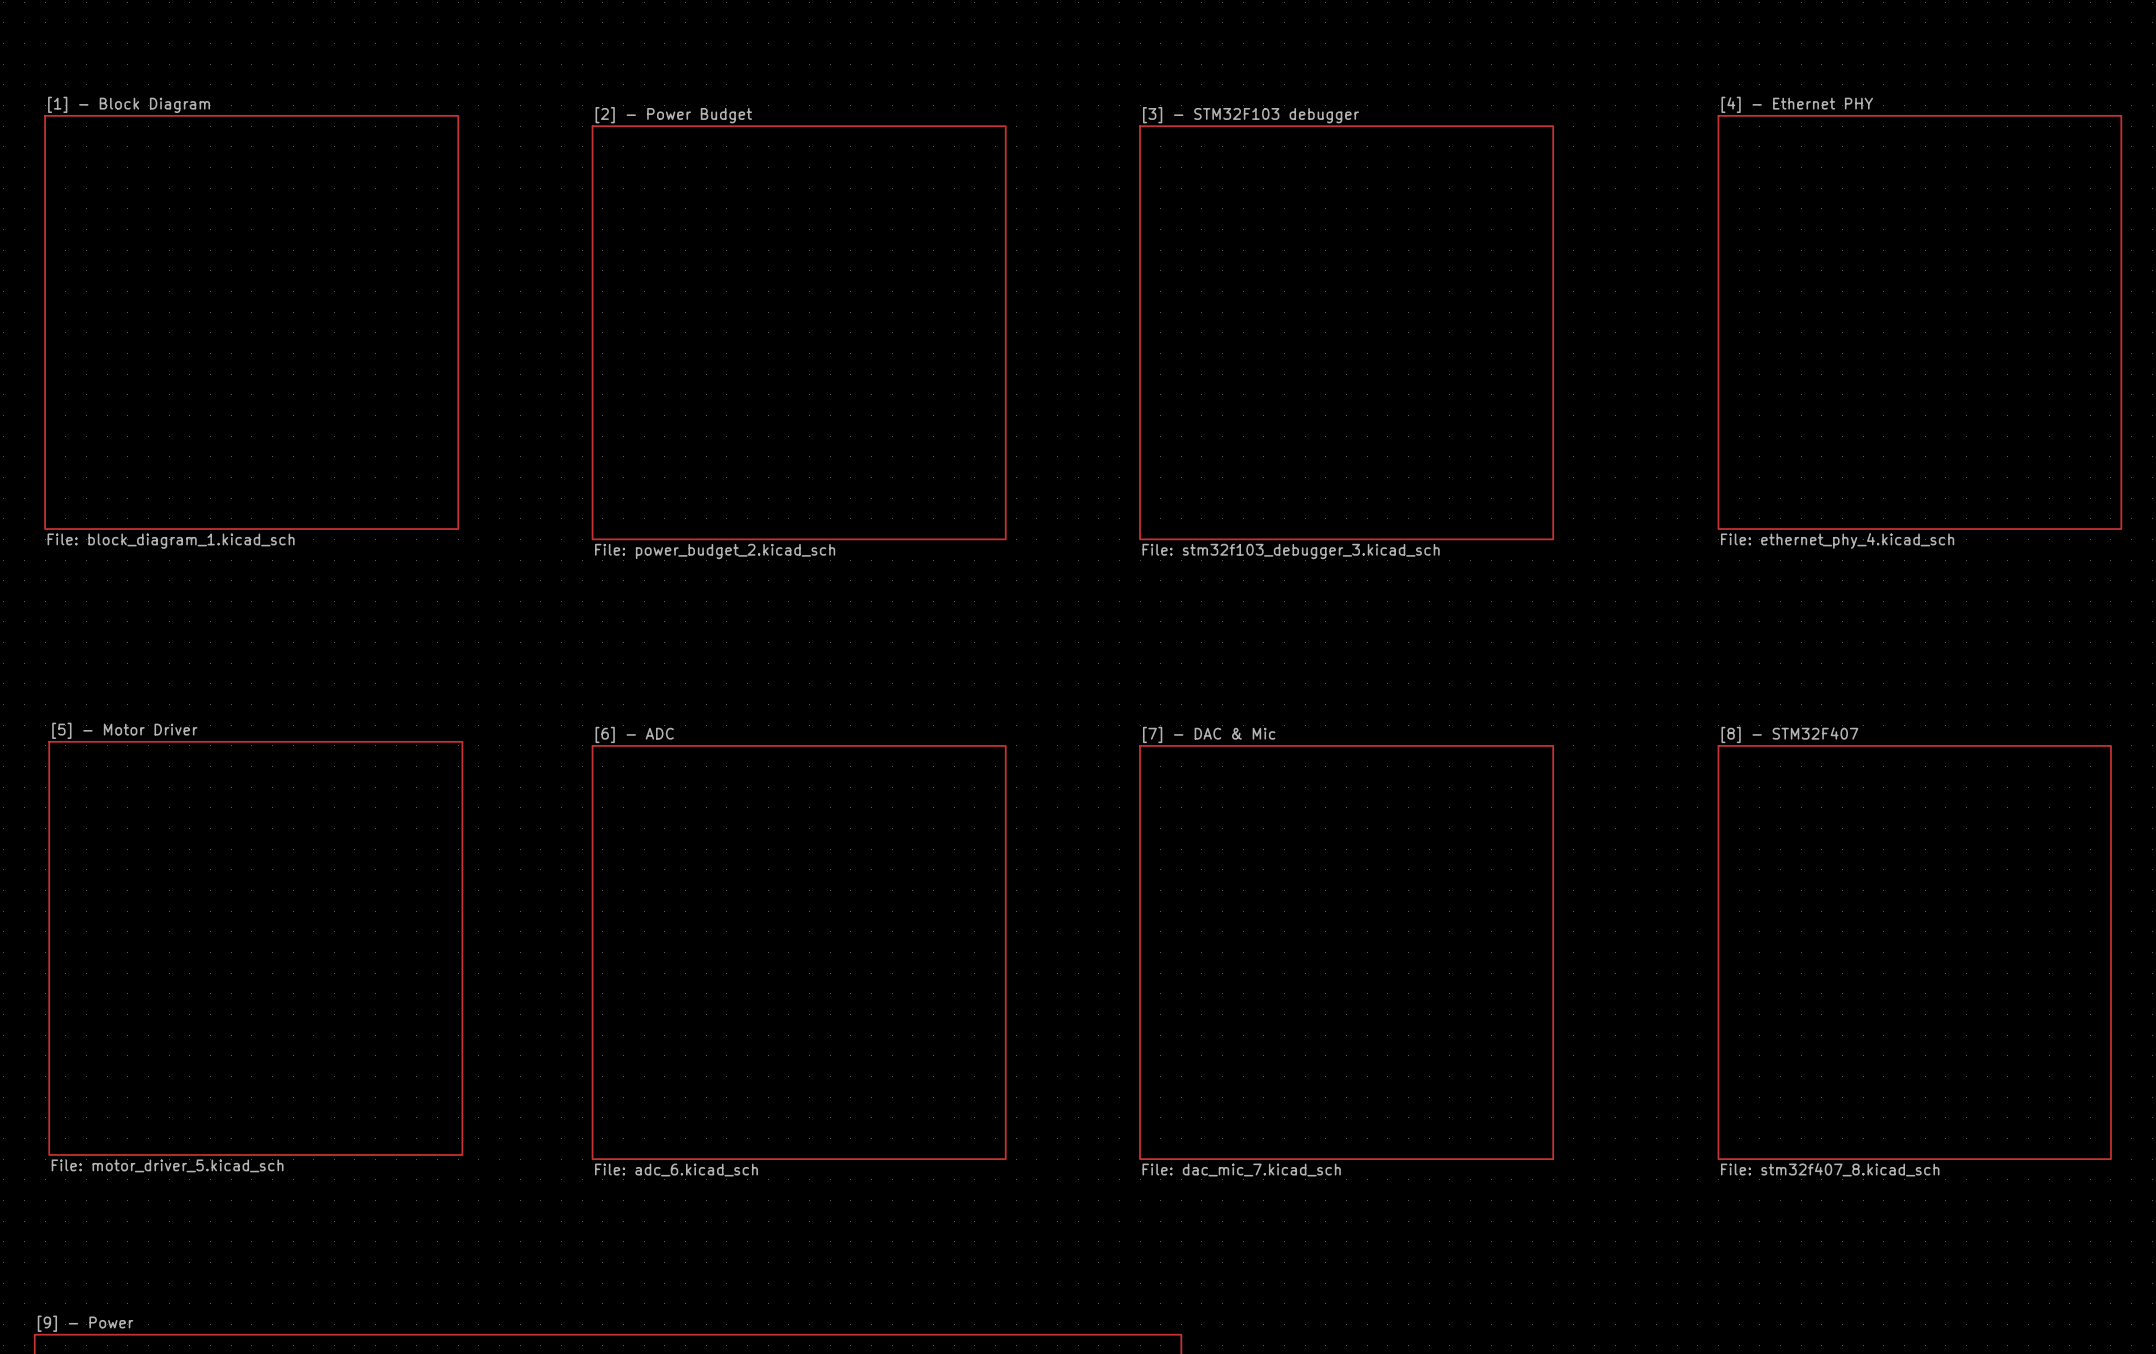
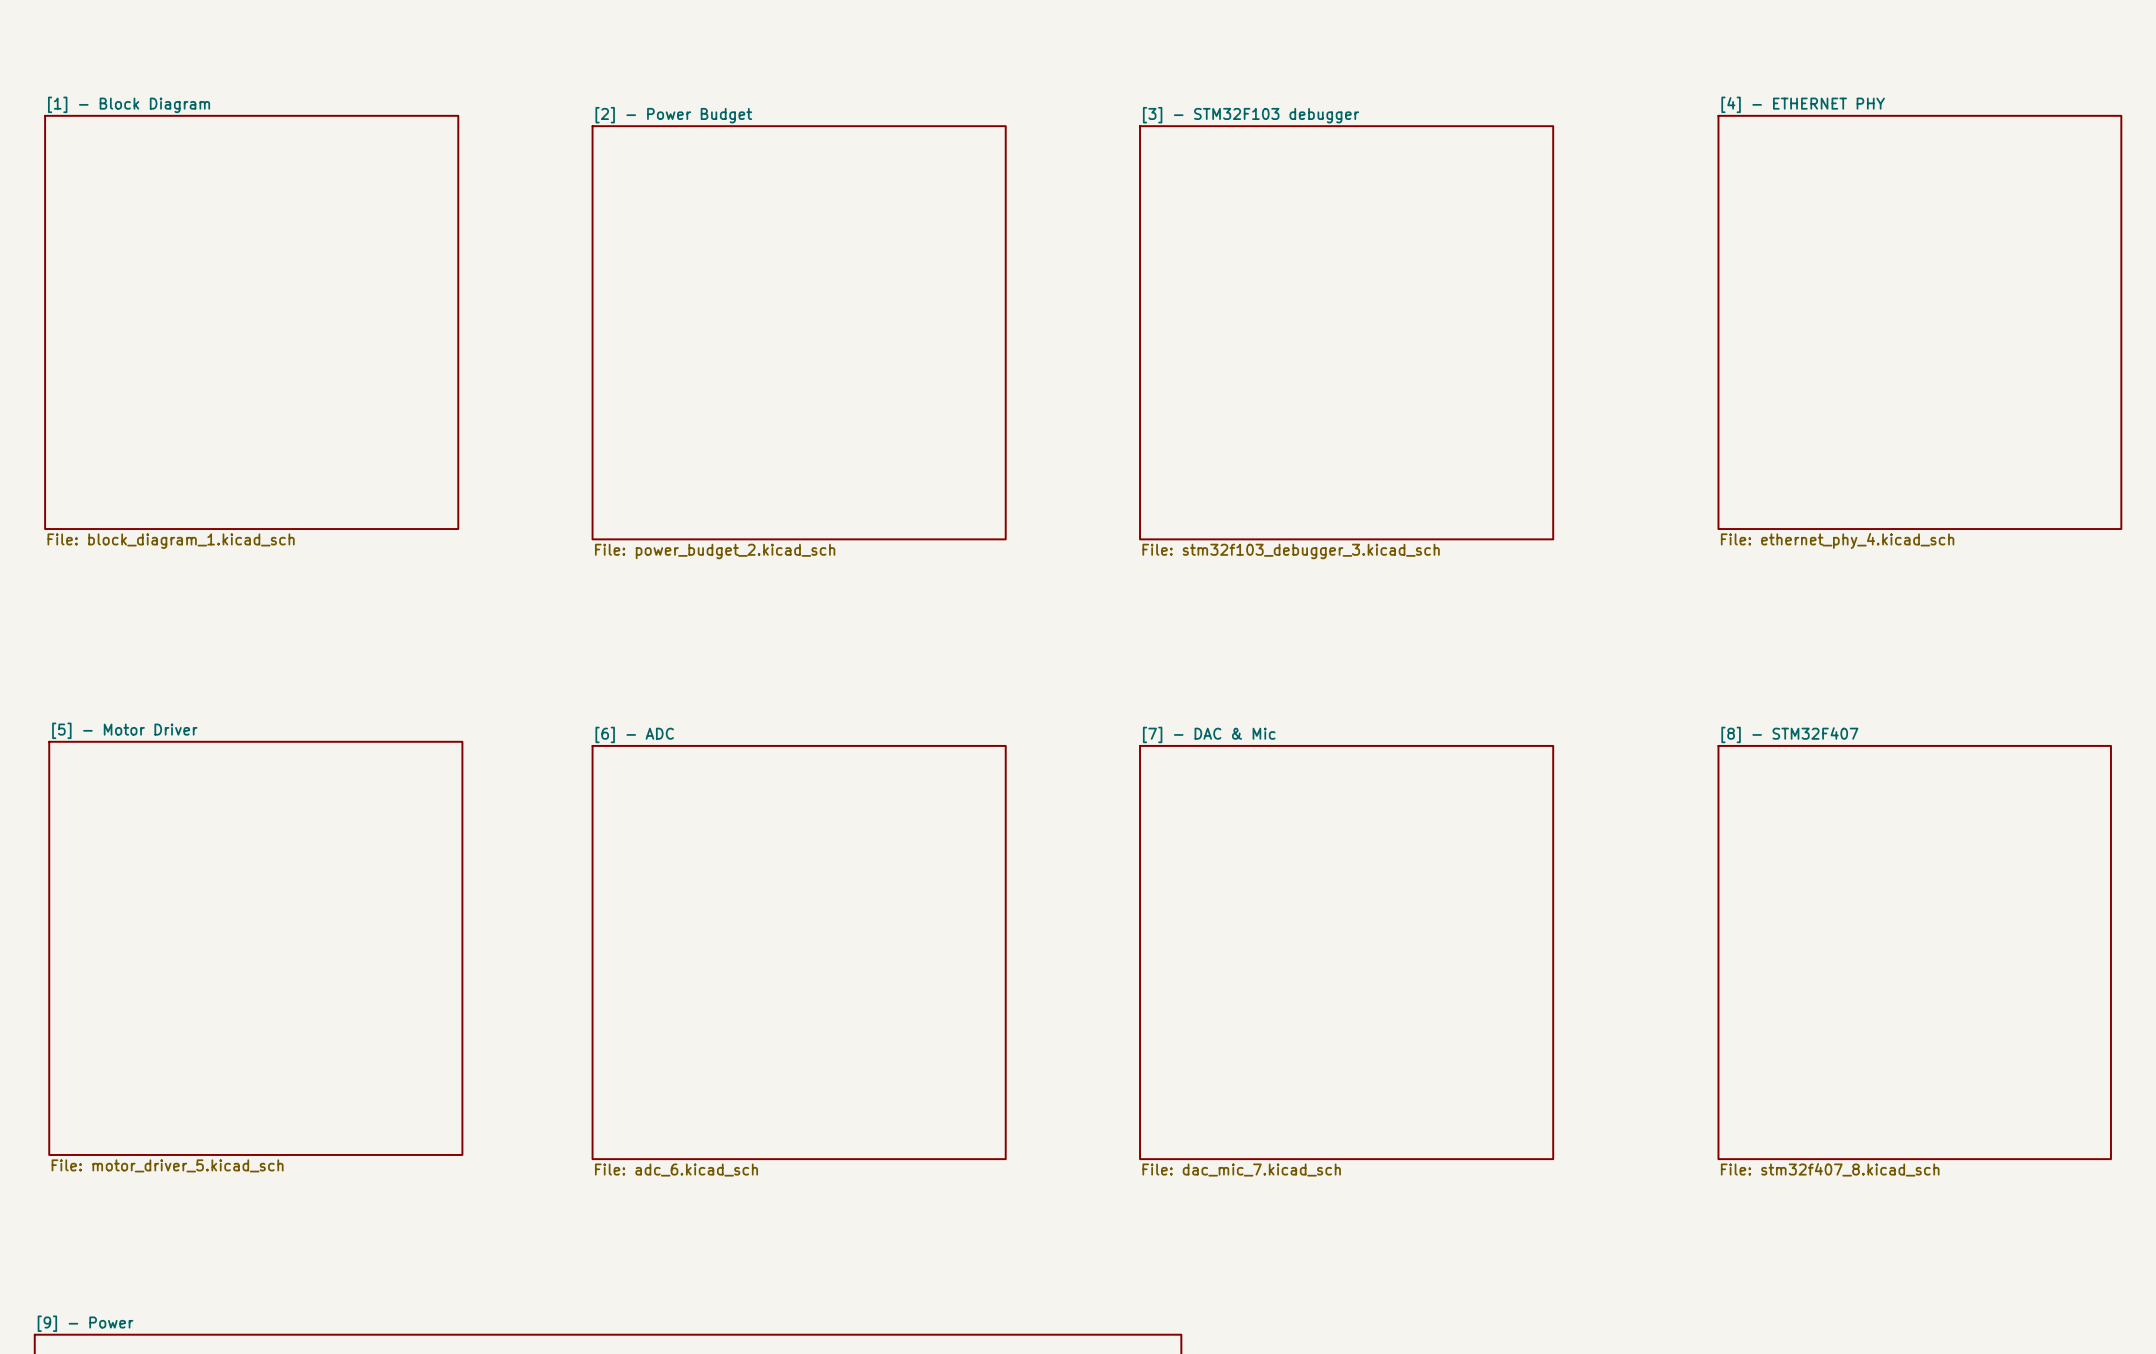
sheet [4] - Ethernet PHY name: [4] - Ethernet PHY (1797, 104) -> [4] - ETHERNET PHY (1803, 104)

